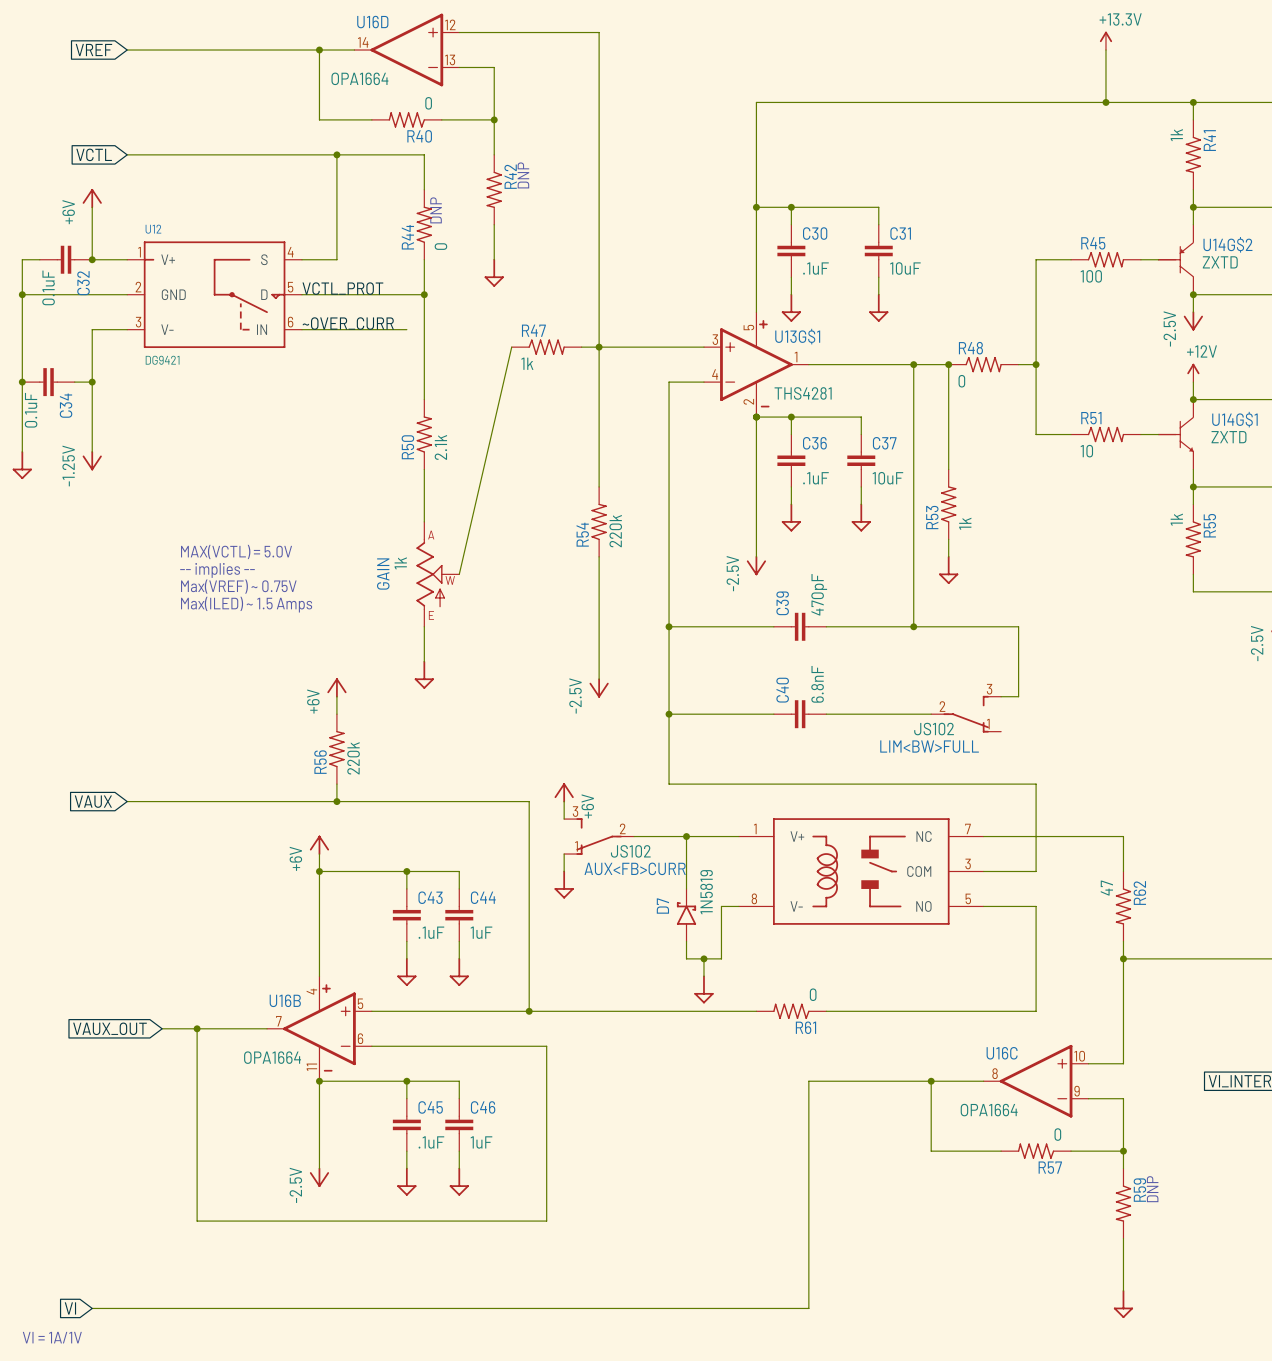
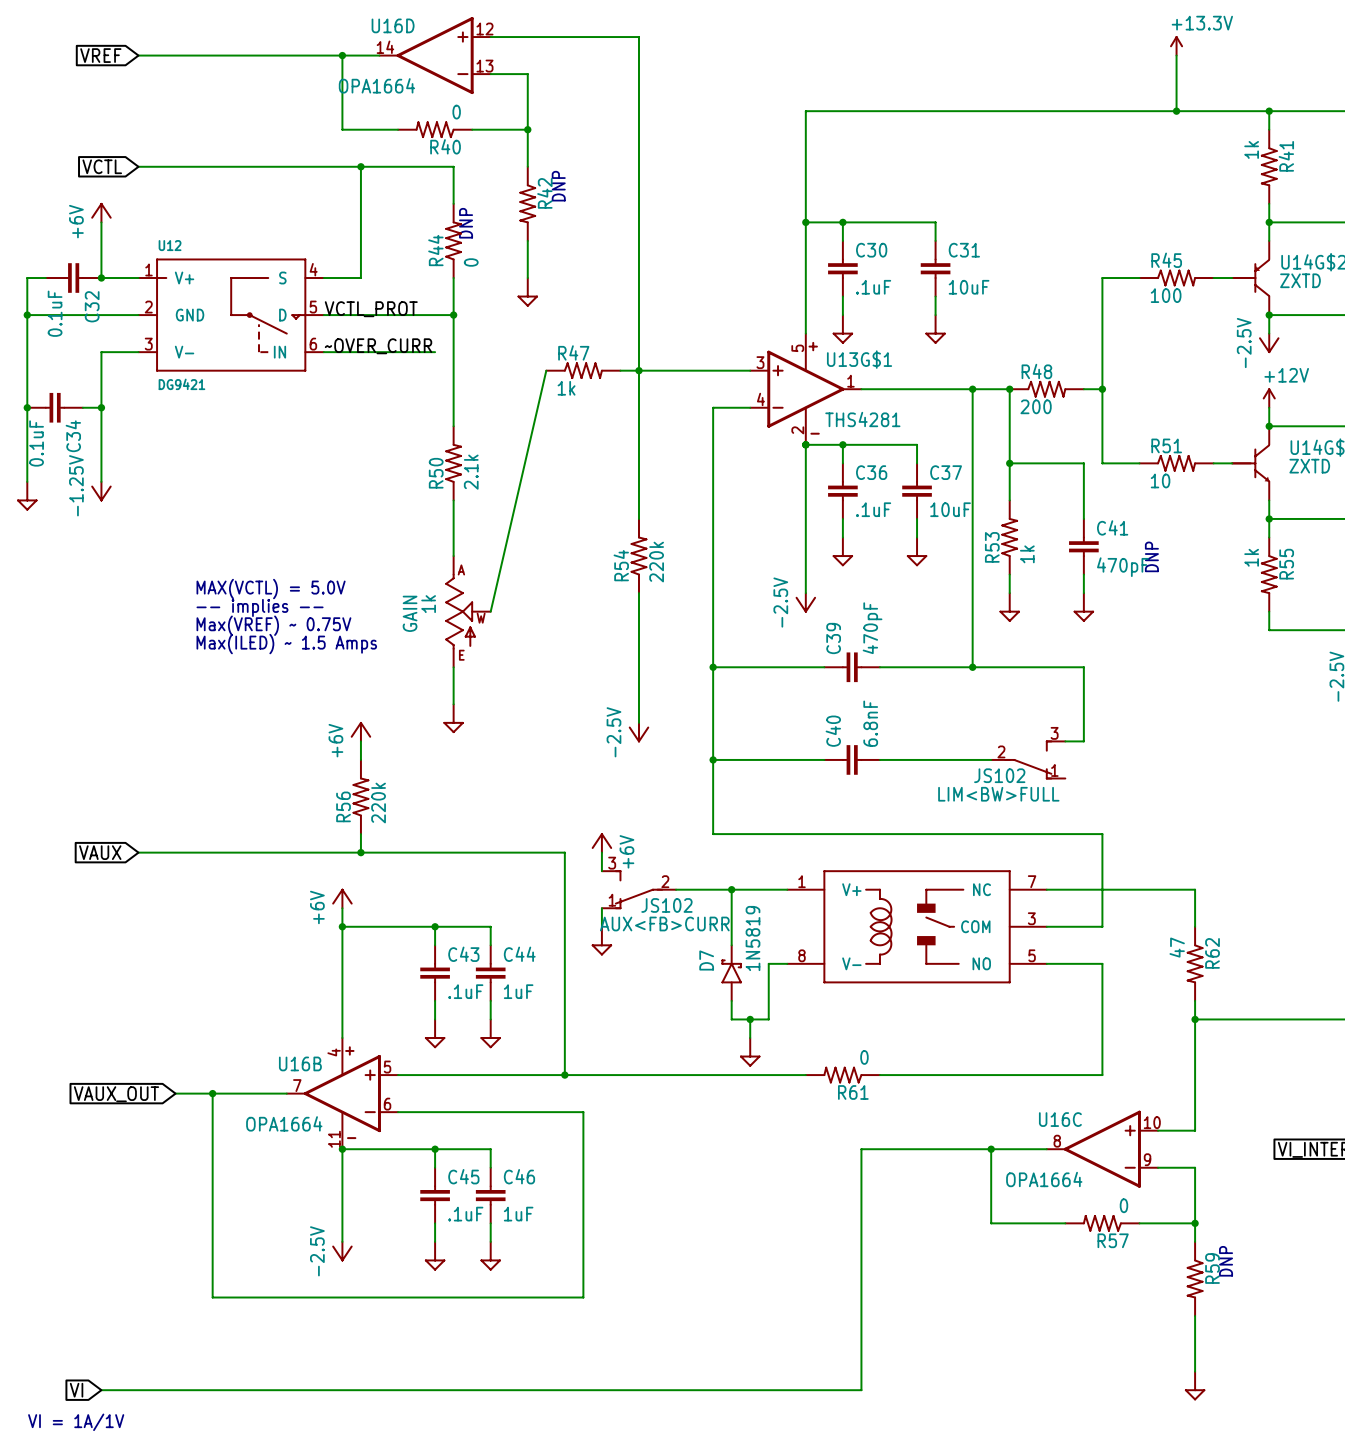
R48 value: 0 (961, 381) -> 200 (1036, 406)
wire: none -> (1009, 463) (1083, 463) (1083, 518)
junction: none -> (1009, 463)
C41: none -> 470pF (1083, 546)
text: none -> DNP (1151, 556)
wire: none -> (1083, 574) (1083, 593)
part: none -> (1083, 607)

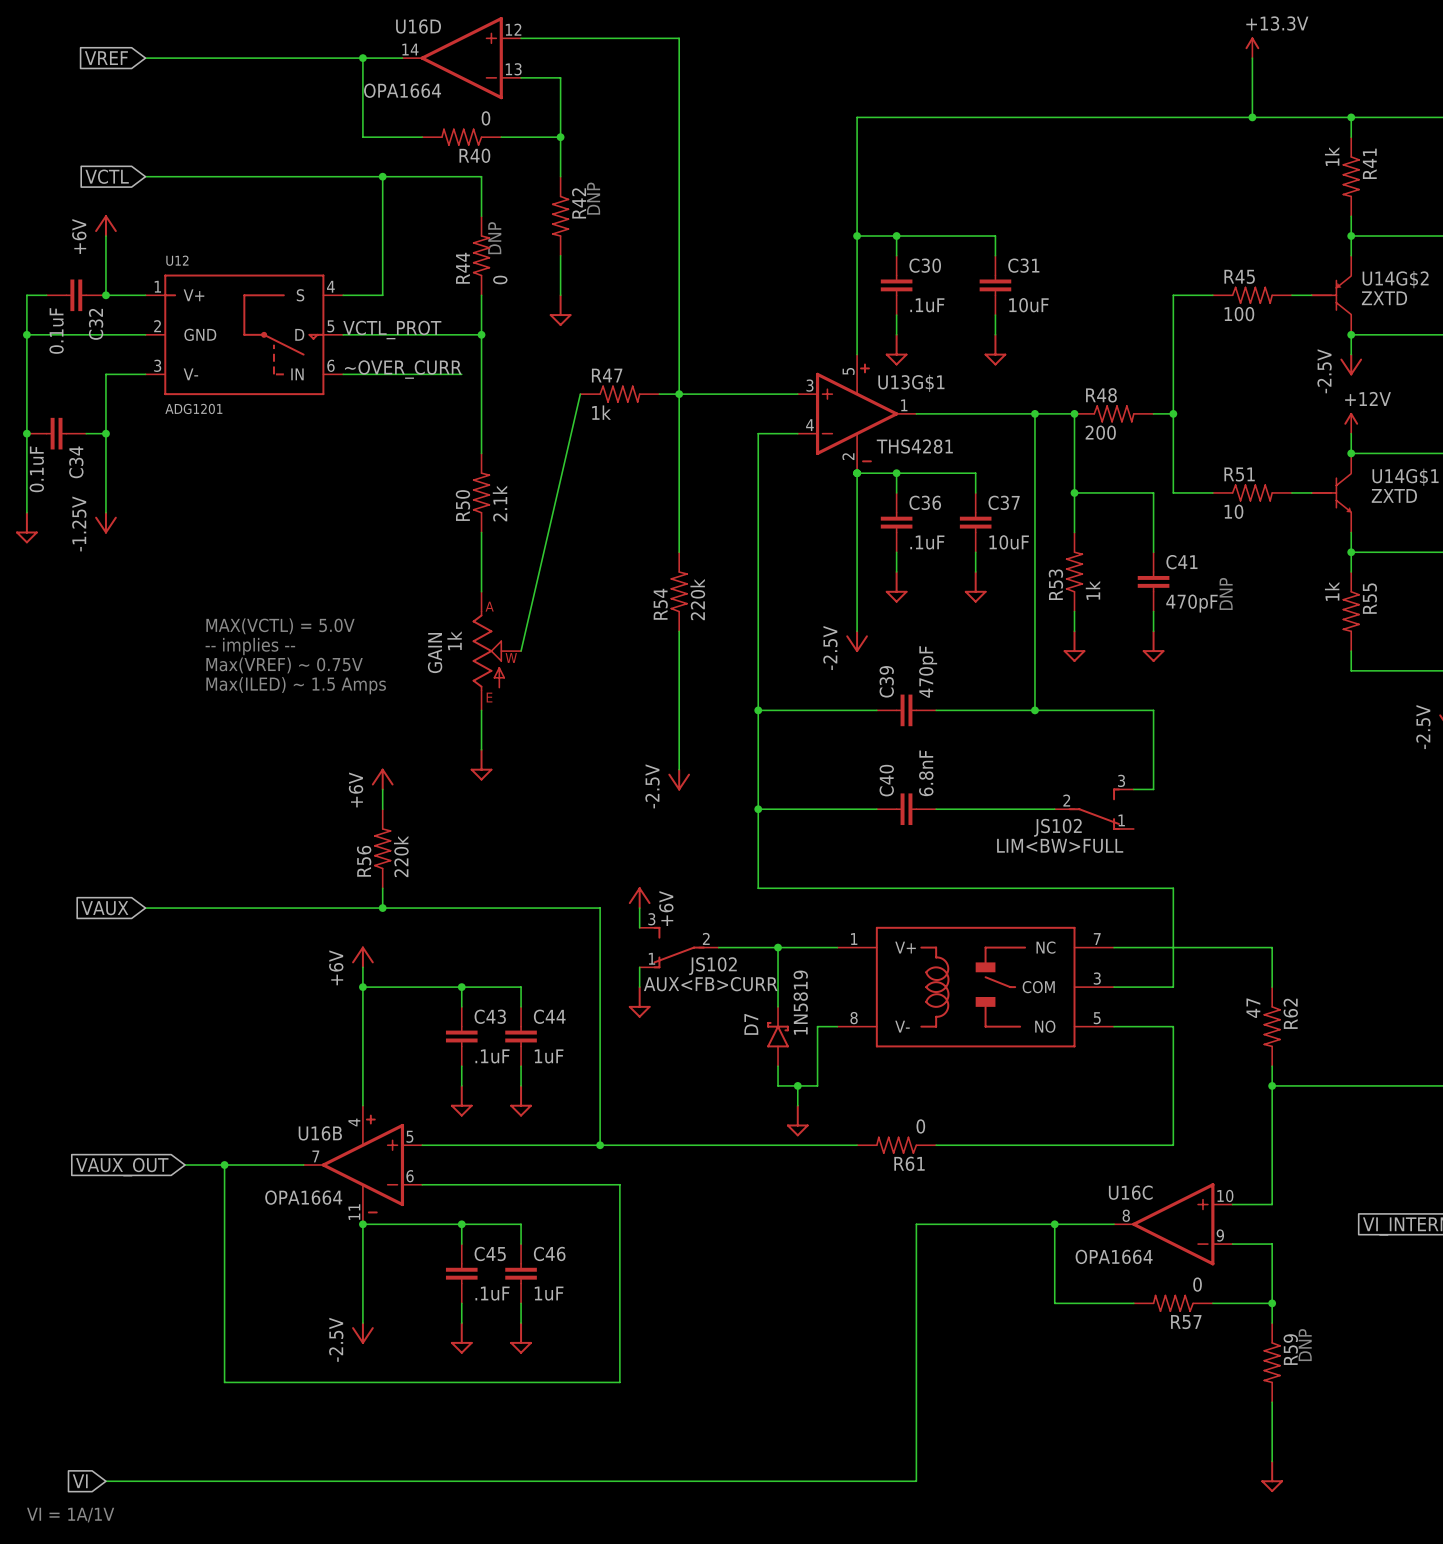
U12 value: DG9421 (181, 384) -> ADG1201 (193, 408)

